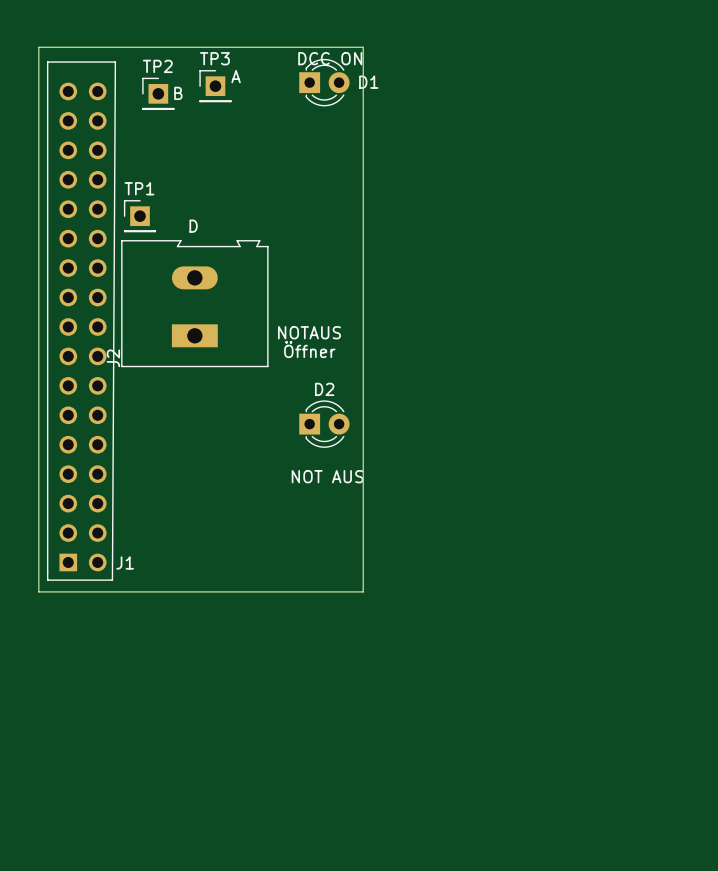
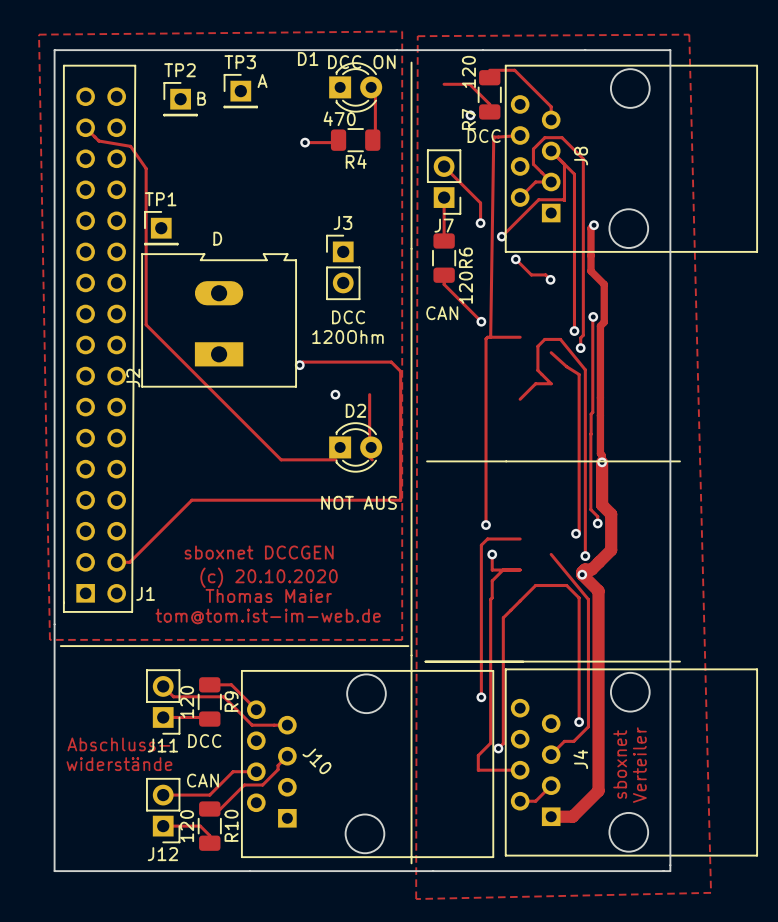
zone outline: none -> (402, 31) (39, 34) (49, 639) (402, 639) (402, 31)
zone outline: none -> (689, 34) (417, 36) (416, 899) (711, 892) (689, 34)
board edge: (363, 47) (363, 591) (38, 591) -> (396, 50) (670, 50) (670, 871) (54, 871) (54, 624)
line: none -> (411, 62) (411, 863)
track: none -> (489, 70) (514, 70) (551, 106) (551, 119)
track: none -> (444, 84) (469, 84) (489, 104) (489, 111)
D1 name position: D1 (368, 82) -> D1 (308, 58)
track: none -> (375, 90) (375, 137) (372, 140)
R7 120: none -> (489, 94)
via: none -> (470, 115)
track: none -> (85, 127) (98, 141) (130, 146) (146, 168) (146, 324) (281, 459) (335, 459)
text: none -> DCC (484, 136)
track: none -> (520, 135) (493, 137) (490, 337)
track: none -> (338, 140) (336, 142) (305, 142)
R4: none -> 470 (355, 140)
via: none -> (305, 142)
track: none -> (551, 150) (574, 174) (574, 331)
J8: none -> (631, 158)
track: none -> (564, 164) (564, 200) (538, 199) (500, 237)
track: none -> (444, 166) (480, 203) (480, 223)
J7: none -> (444, 182)
track: none -> (444, 197) (444, 241)
track: none -> (520, 197) (535, 182) (551, 182) (533, 164) (533, 149) (544, 137) (562, 137) (583, 158) (583, 335) (580, 337) (580, 348)
via: none -> (480, 223)
track: none -> (594, 224) (590, 228) (590, 271) (604, 284) (604, 322) (600, 326) (602, 505) (611, 514) (611, 550) (591, 569) (584, 569) (582, 574) (598, 590) (598, 790) (572, 816) (551, 816)
via: none -> (594, 225)
via: none -> (501, 236)
R6: none -> 120 (444, 258)
track: none -> (514, 258) (531, 274) (545, 274) (550, 279)
via: none -> (515, 259)
J3: none -> (343, 267)
track: none -> (444, 275) (444, 284) (481, 321)
via: none -> (550, 279)
text: none -> CAN (442, 313)
text: none -> DCC (348, 317)
via: none -> (593, 316)
track: none -> (592, 317) (590, 509) (597, 516) (597, 523)
via: none -> (481, 321)
via: none -> (574, 331)
text: none -> 120Ohm (347, 337)
track: none -> (520, 337) (486, 338) (486, 525)
via: none -> (580, 348)
text: NOTAUS (309, 332) -> none
track: none -> (551, 352) (566, 366) (579, 374) (579, 531) (576, 533)
track: none -> (299, 365) (302, 362) (391, 362) (400, 371) (400, 500) (191, 500) (129, 562) (116, 562)
via: none -> (299, 365)
text: Öffner (309, 349) -> none
via: none -> (335, 394)
track: none -> (369, 394) (369, 457) (372, 459)
track: none -> (520, 399) (535, 383) (551, 383) (537, 370) (537, 346) (544, 339) (560, 339) (585, 369) (585, 556)
line: none -> (427, 461) (680, 461)
via: none -> (602, 462)
via: none -> (597, 523)
via: none -> (486, 525)
via: none -> (576, 533)
track: none -> (520, 539) (487, 539) (481, 545) (481, 697)
text: none -> sboxnet DCCGEN (259, 552)
track: none -> (492, 552) (492, 570) (506, 570)
via: none -> (492, 554)
track: none -> (551, 554) (588, 599) (588, 726) (573, 741) (564, 741) (551, 754)
via: none -> (585, 556)
track: none -> (520, 569) (503, 569) (492, 580) (490, 743) (478, 755) (478, 770) (520, 770)
via: none -> (582, 574)
text: none -> (c) 20.10.2020 (269, 577)
text: none -> Thomas Maier (268, 595)
text: none -> tom@tom.ist-im-web.de (268, 616)
line: none -> (60, 646) (408, 646)
line: none -> (425, 661) (680, 661)
track: none -> (209, 684) (231, 684) (256, 709)
track: none -> (163, 686) (173, 696) (223, 696) (252, 725) (287, 725)
via: none -> (481, 697)
J11: none -> (163, 701)
R9: none -> 120 (209, 701)
track: none -> (163, 717) (208, 717) (209, 719)
track: none -> (579, 722) (579, 597) (566, 585) (535, 585) (503, 617) (503, 743) (498, 748)
via: none -> (579, 722)
text: none -> DCC (204, 741)
text: none -> Abschluss- (118, 744)
via: none -> (498, 748)
track: none -> (287, 756) (278, 765) (278, 769) (262, 785) (244, 785) (220, 809) (209, 809)
J4: none -> (631, 762)
text: none -> widerstände (119, 764)
J10: none -> (367, 764)
text: none -> sboxnet (620, 764)
text: none -> Verteiler (639, 765)
track: none -> (256, 771) (233, 771) (209, 795) (163, 795)
text: none -> CAN (202, 780)
track: none -> (551, 785) (535, 801) (520, 801)
J12: none -> (163, 810)
track: none -> (163, 826) (200, 826) (209, 835) (209, 843)
R10: none -> 120 (209, 826)

